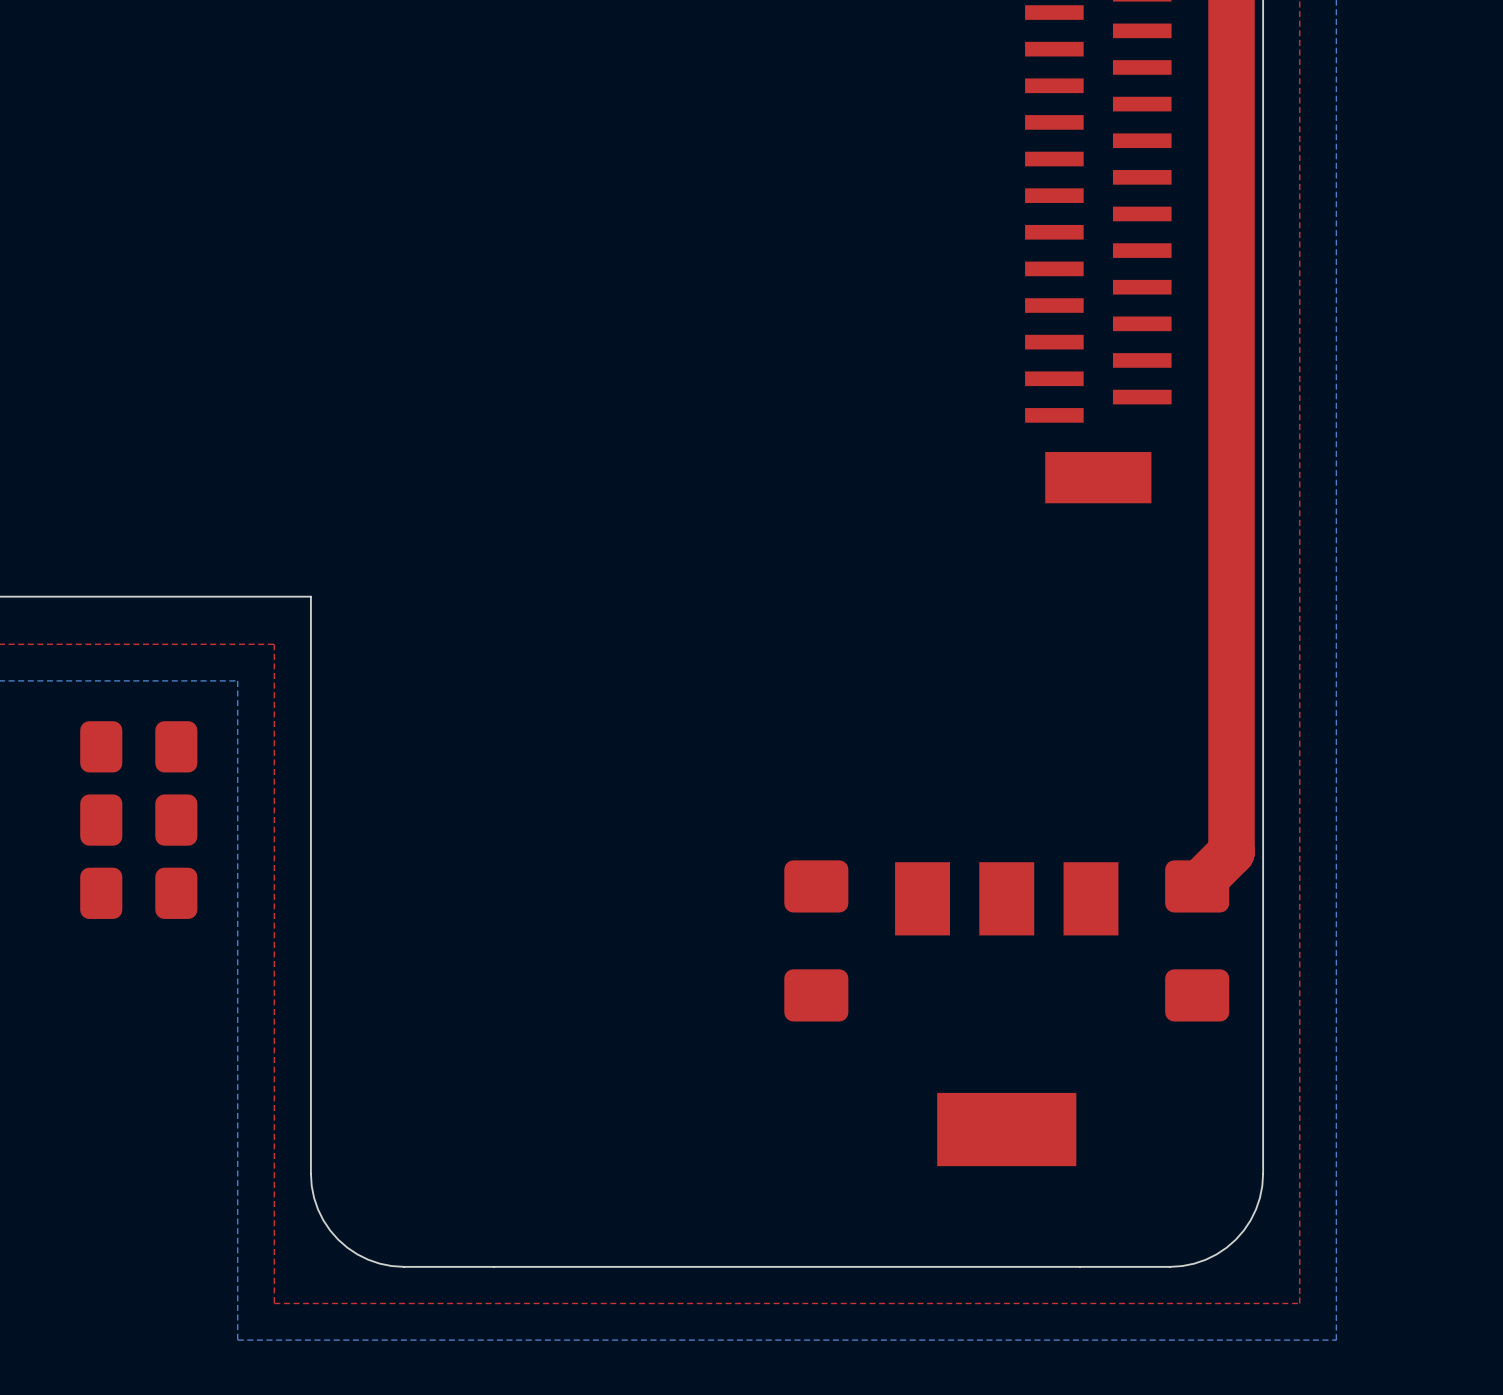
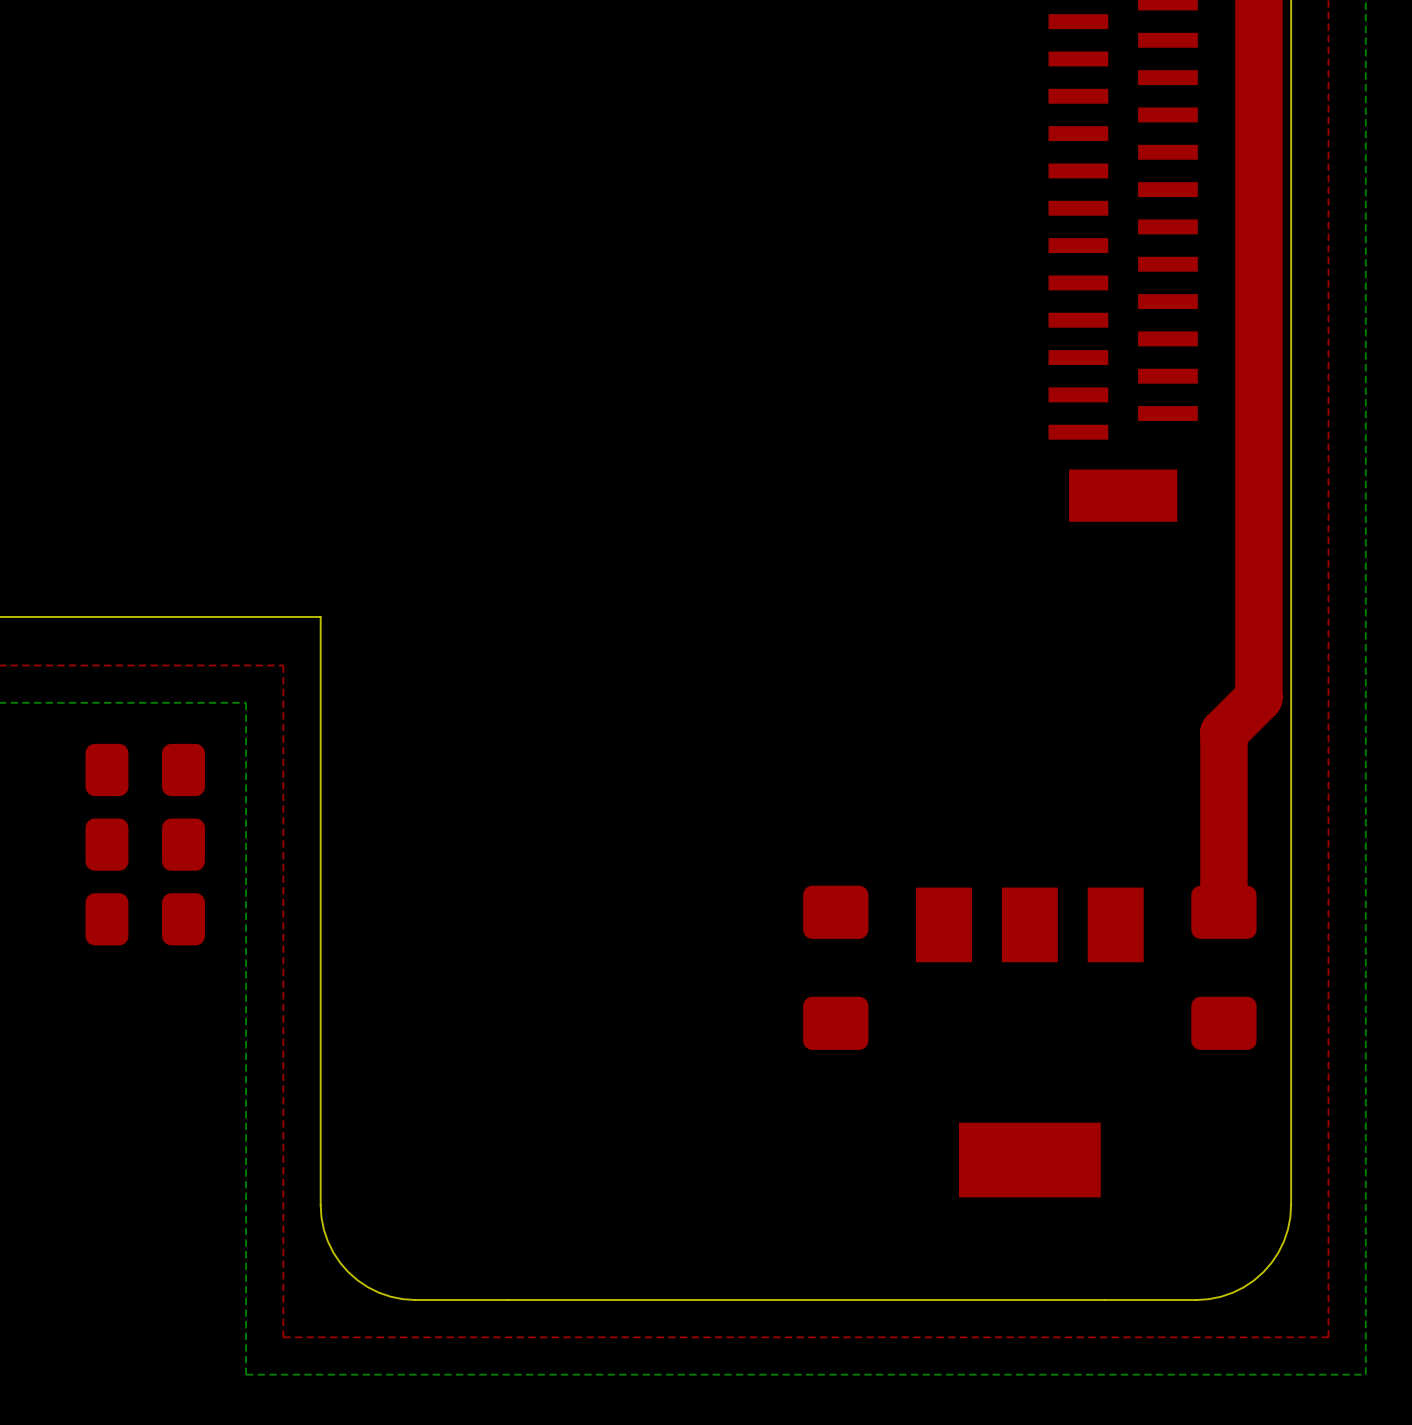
top track: (1231, 675) (1231, 852) (1197, 886) -> (1258, 697) (1223, 732) (1223, 912)

